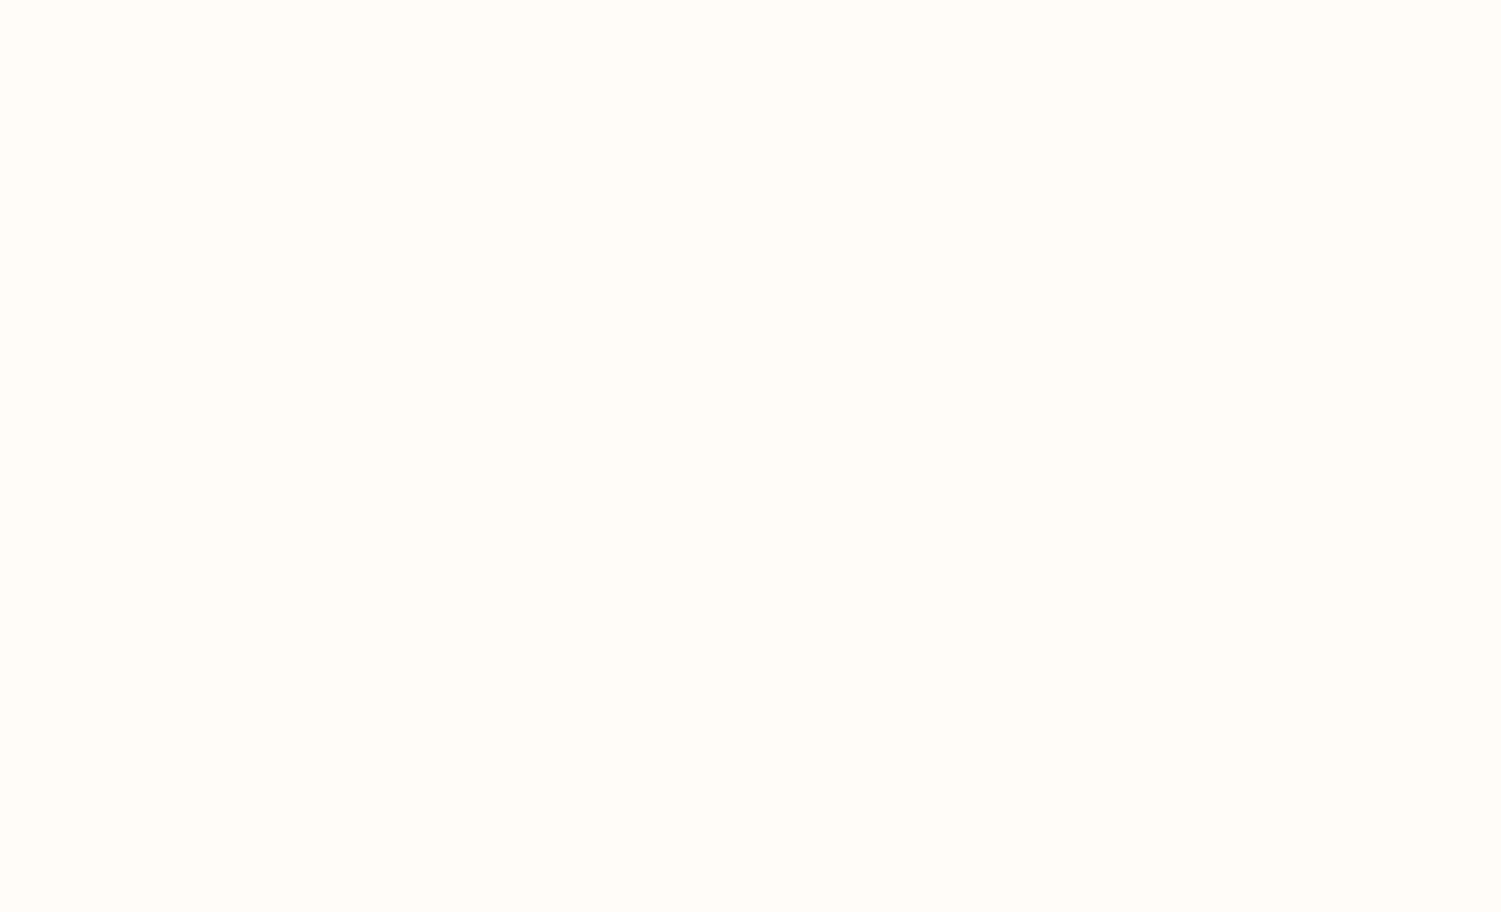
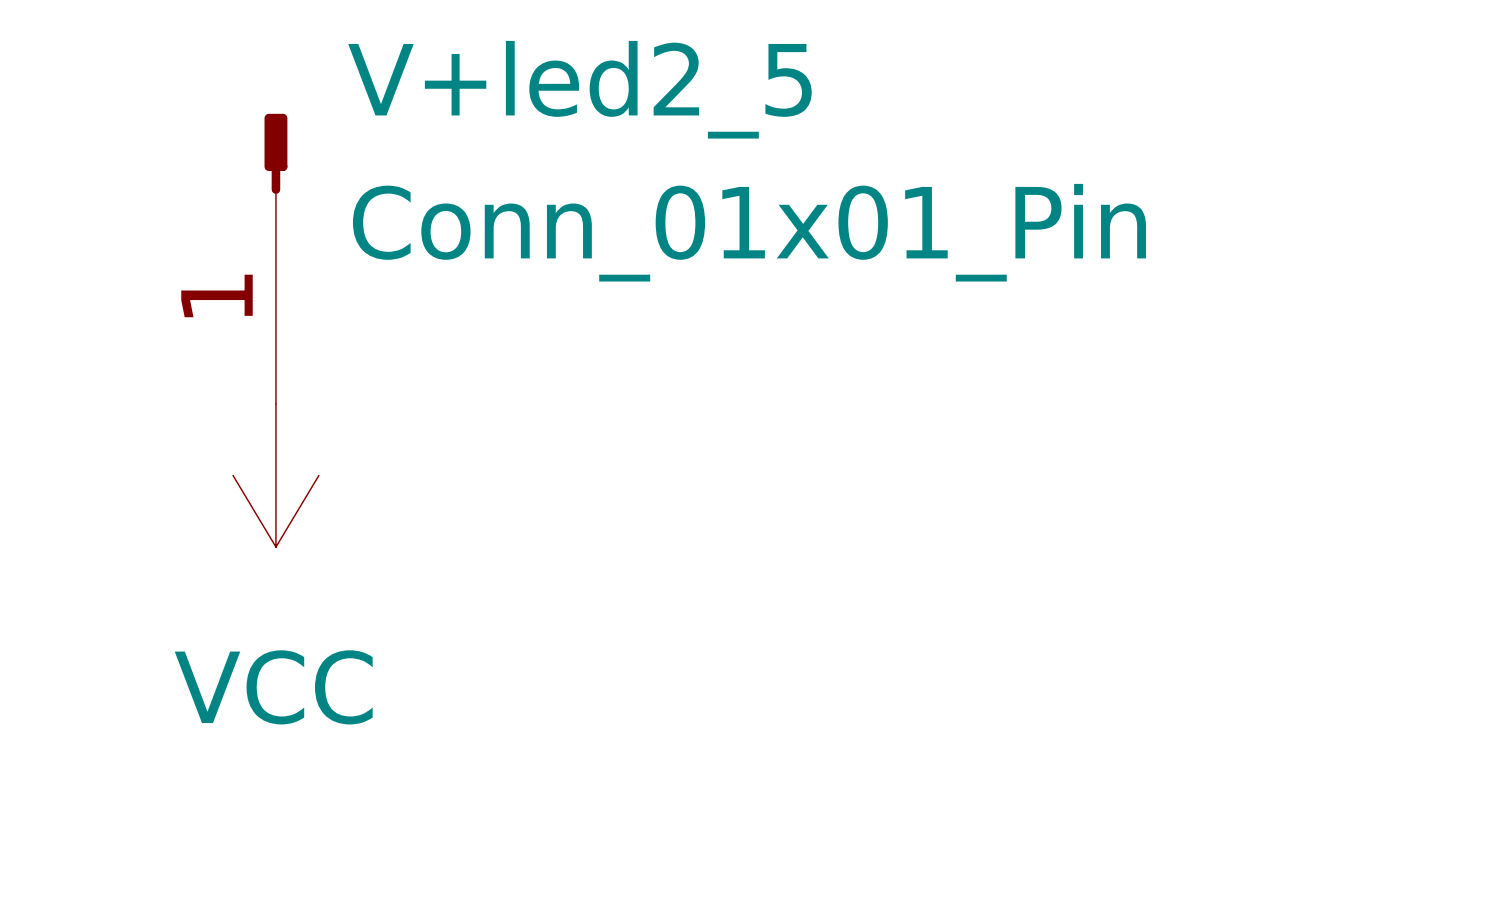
V+led2_5: none -> Conn_01x01_Pin (275, 258)
power symbol: none -> VCC (275, 475)

